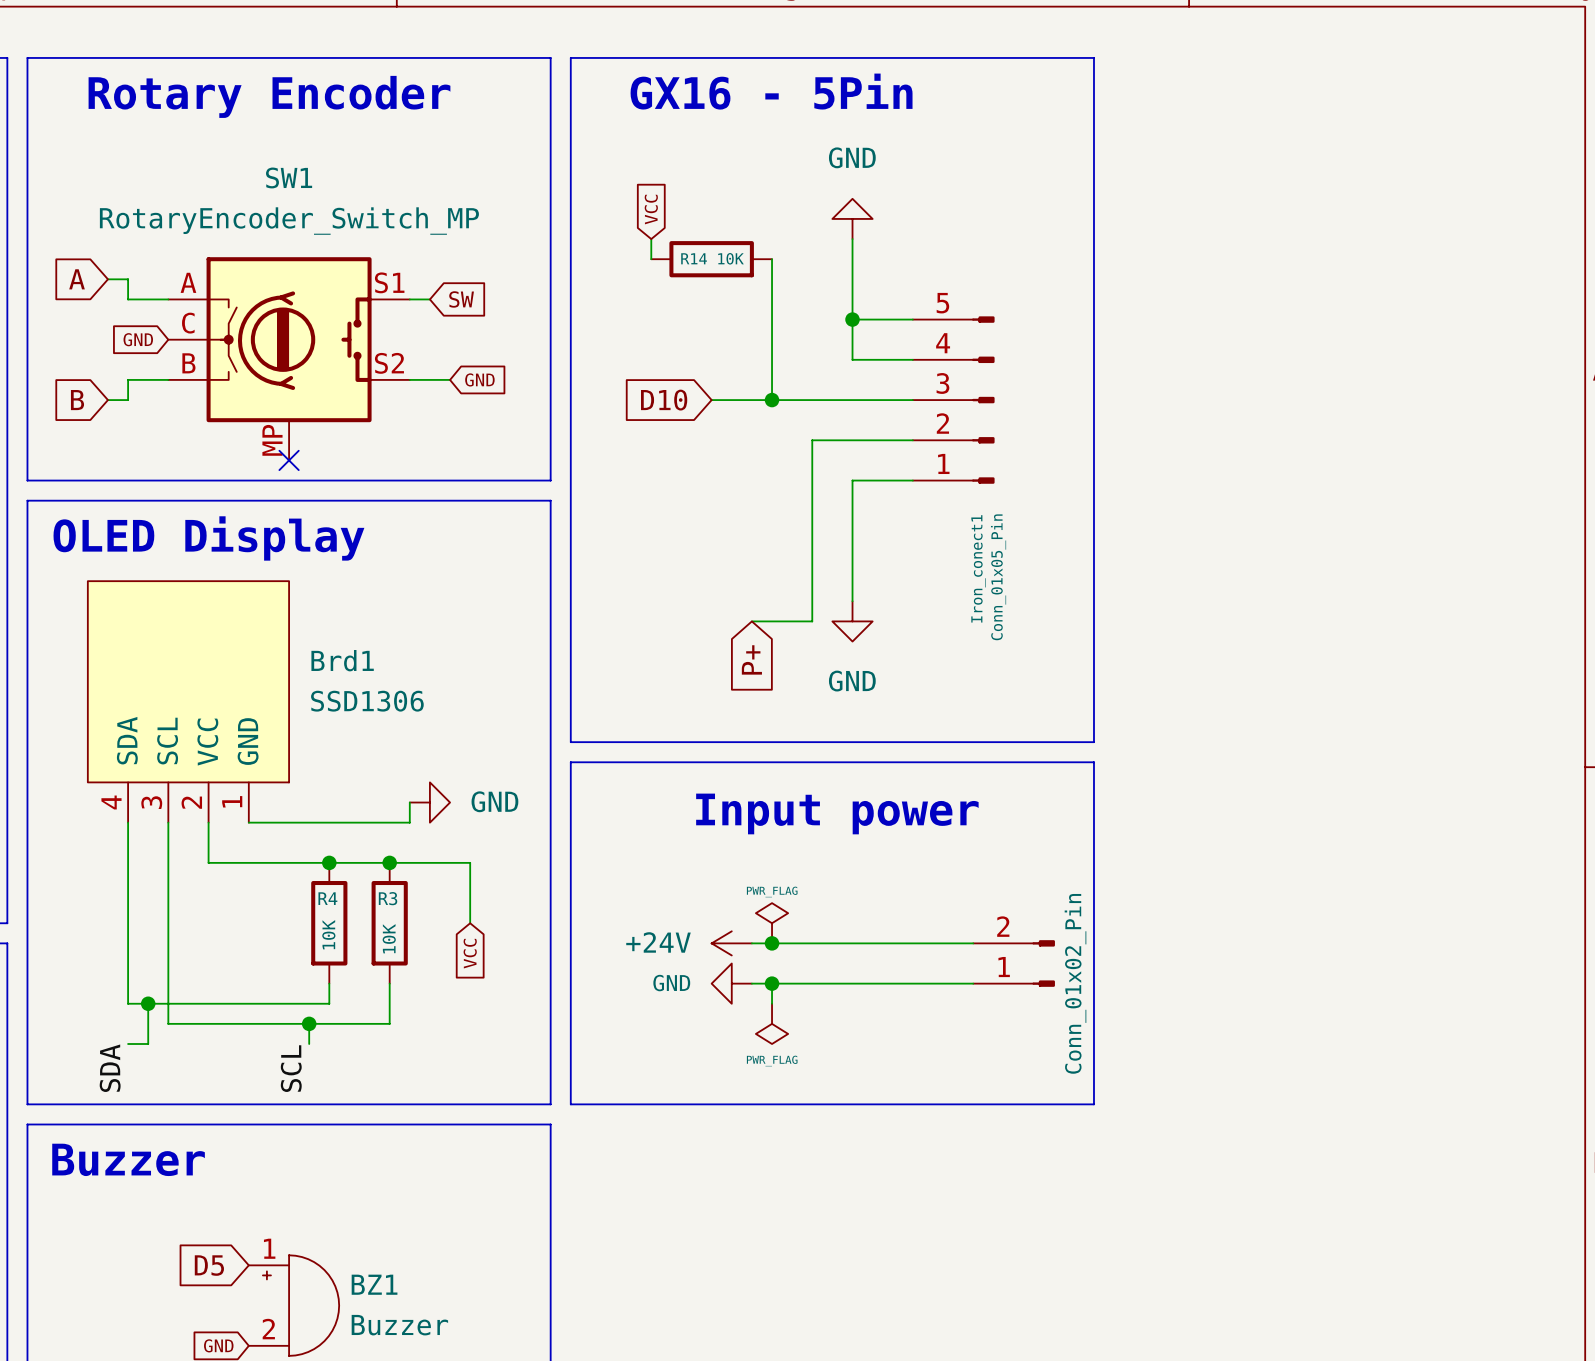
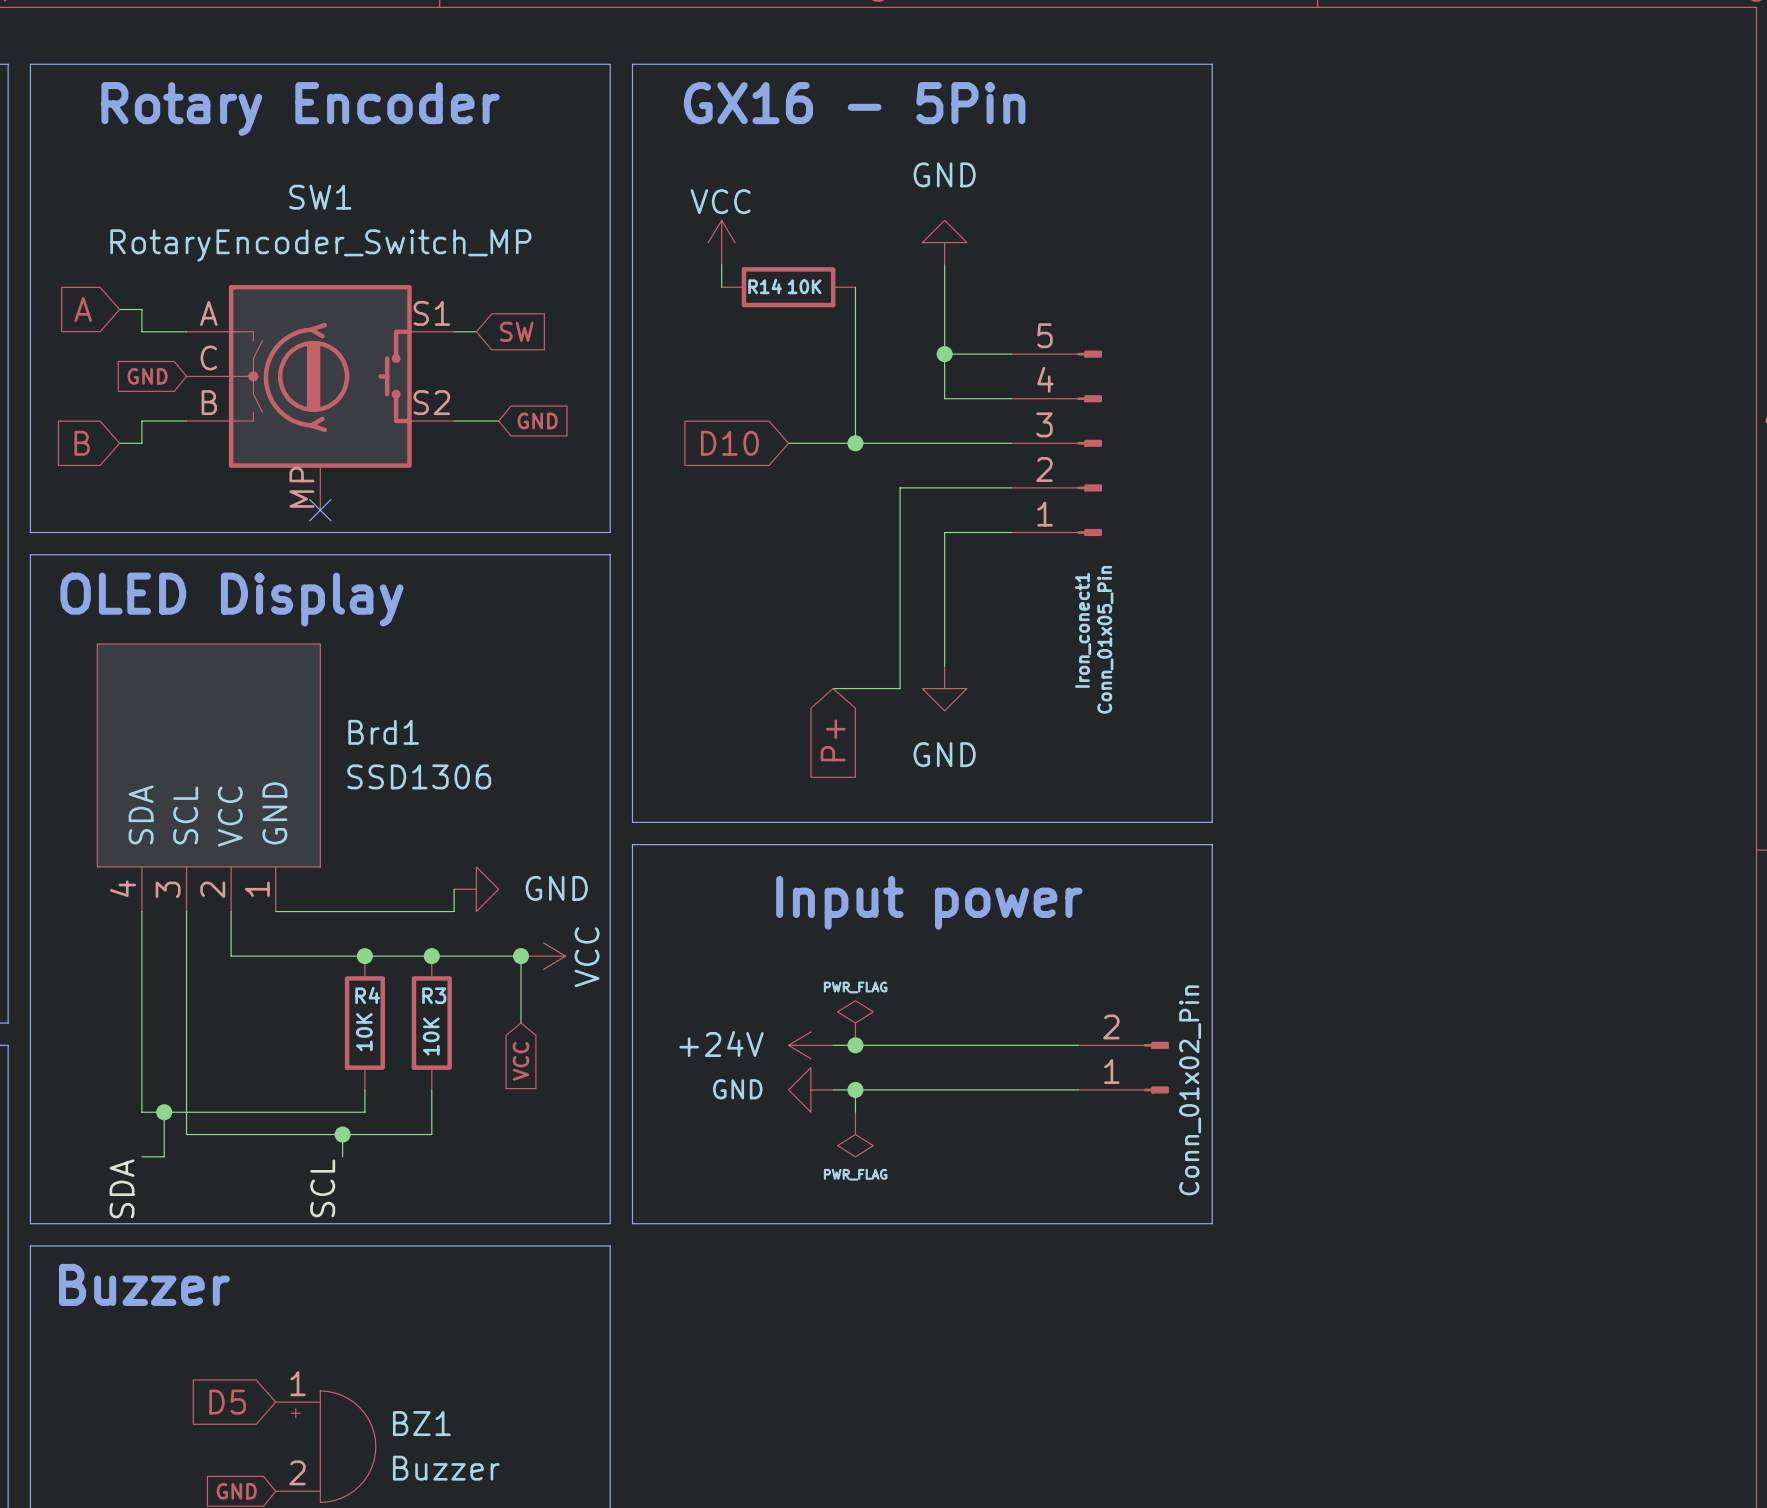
global label: VCC (651, 209) -> none
power symbol: none -> VCC (721, 242)
junction: none -> (520, 956)
power symbol: none -> VCC (543, 956)

